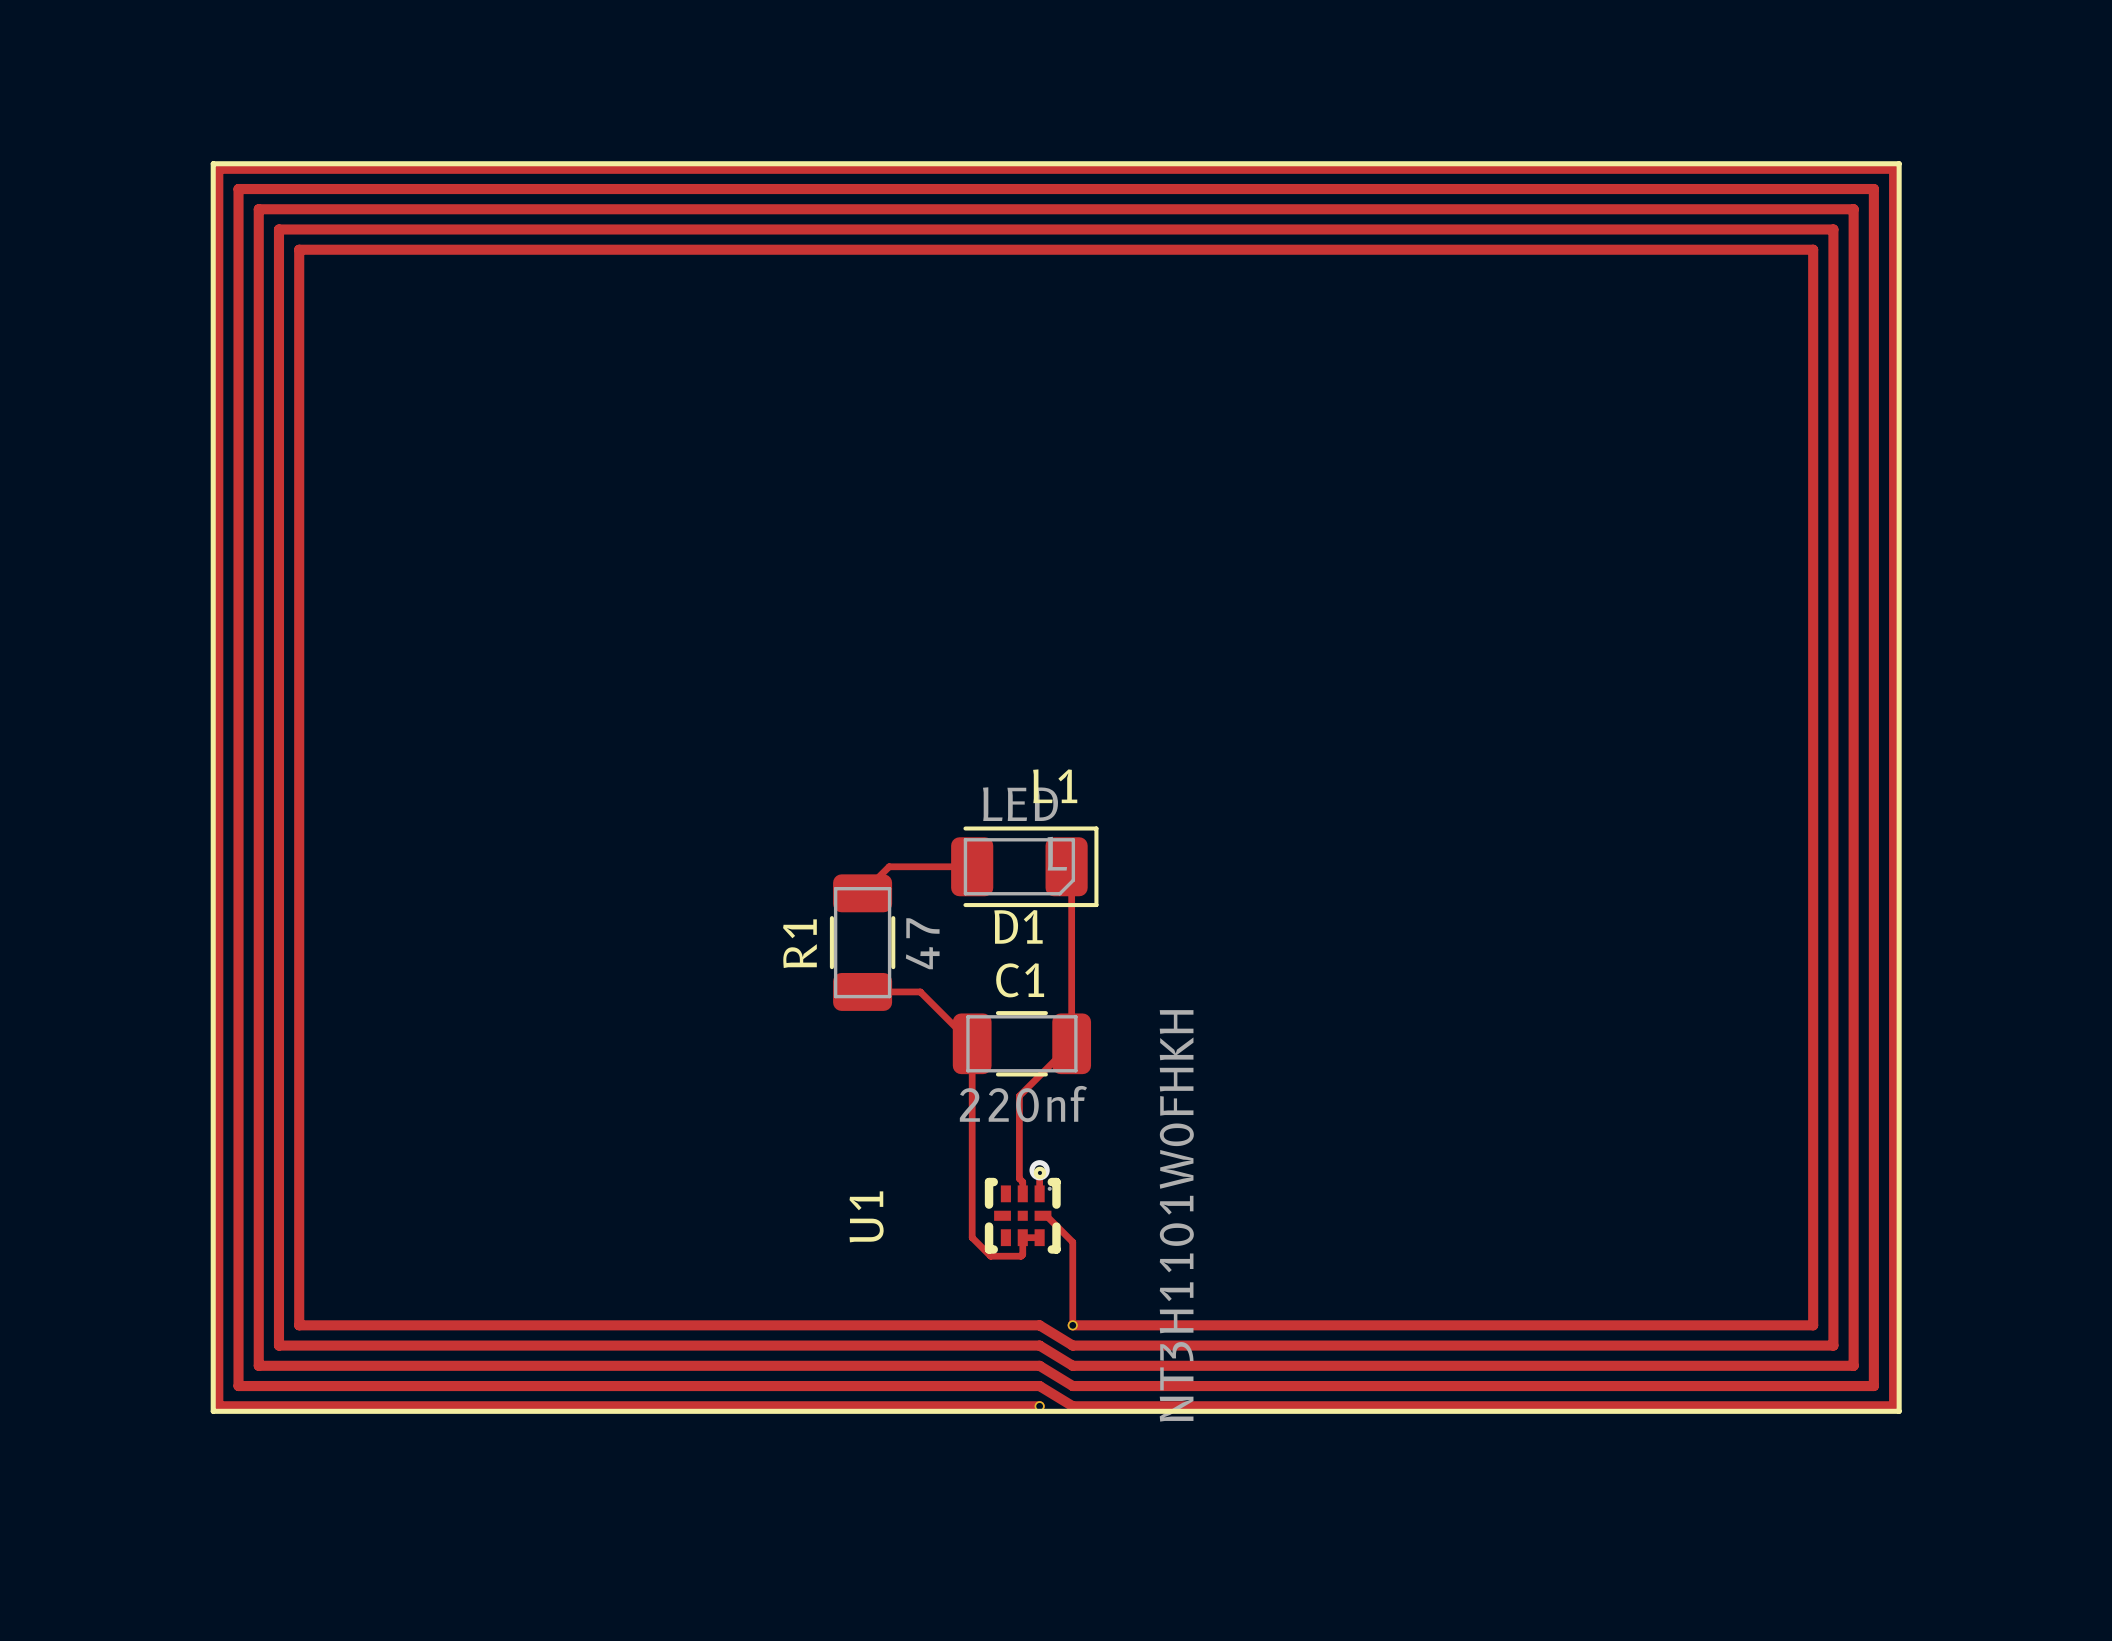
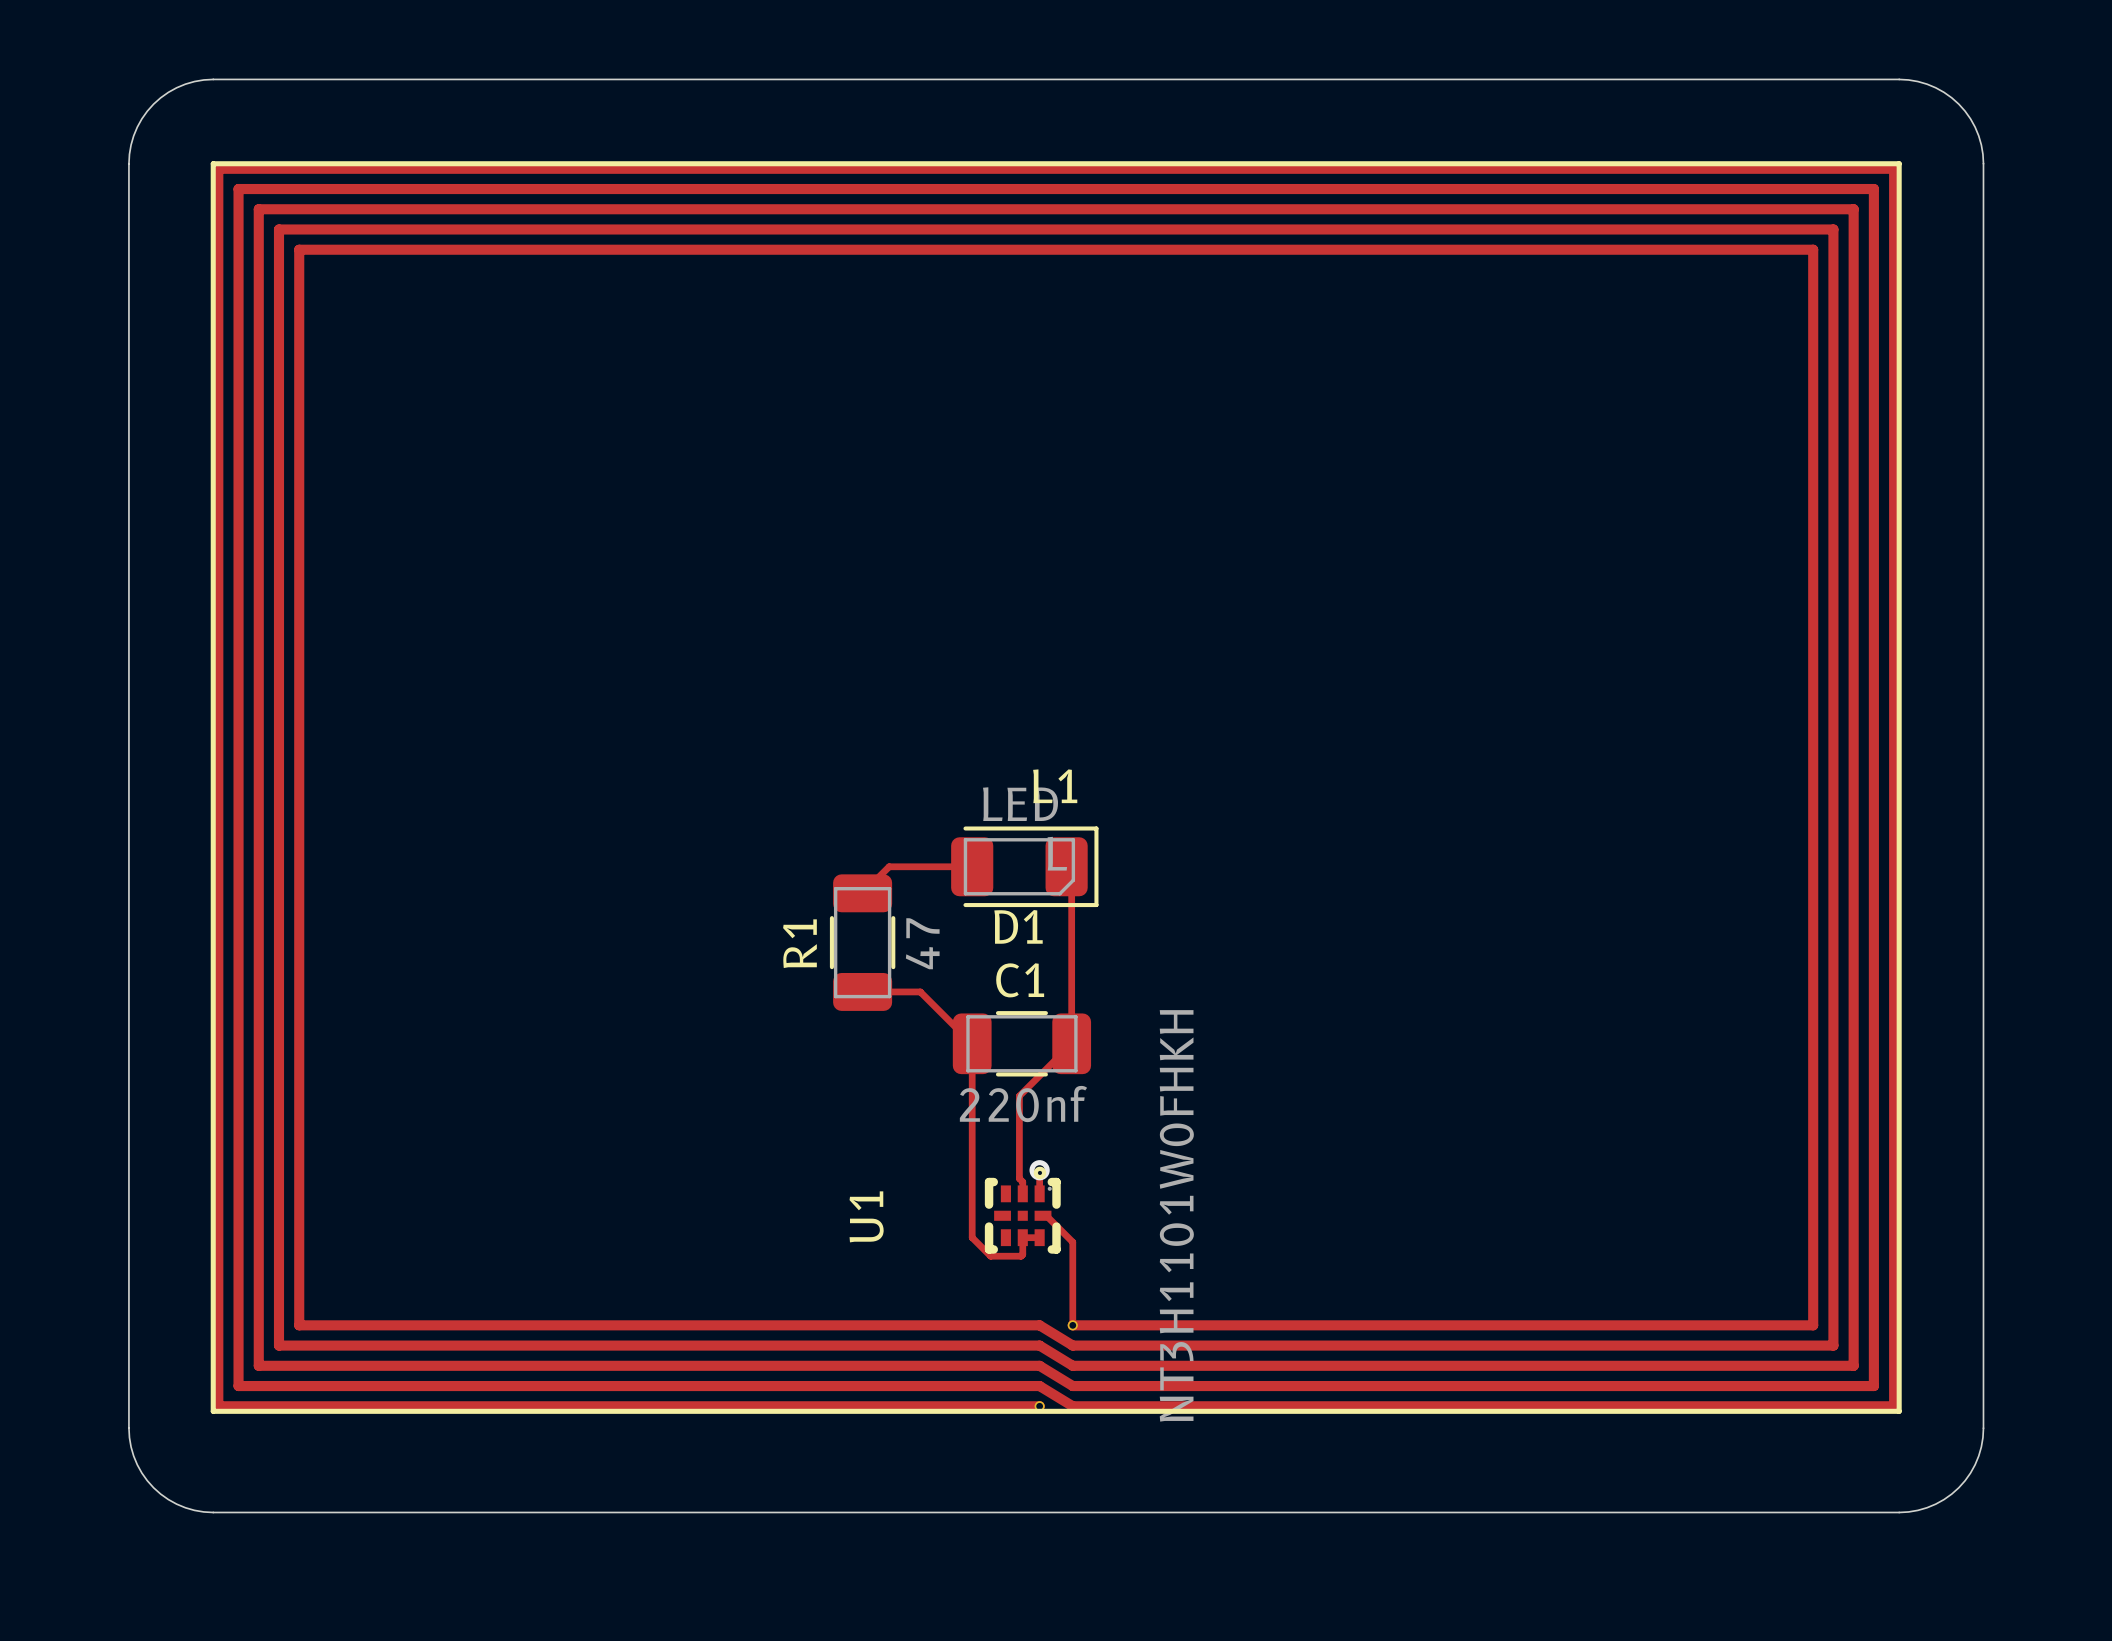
board edge: none -> (213, 79) (1899, 79) (1927, 84) (1951, 97) (1965, 111) (1975, 127) (1981, 144) (1983, 163) (1983, 1428) (1978, 1456) (1965, 1480) (1951, 1494) (1935, 1504) (1917, 1510) (1899, 1512) (213, 1512) (185, 1507) (160, 1494) (147, 1480) (137, 1464) (131, 1446) (128, 1428) (128, 163) (133, 135) (141, 118) (153, 104) (168, 92) (185, 84) (213, 79)

